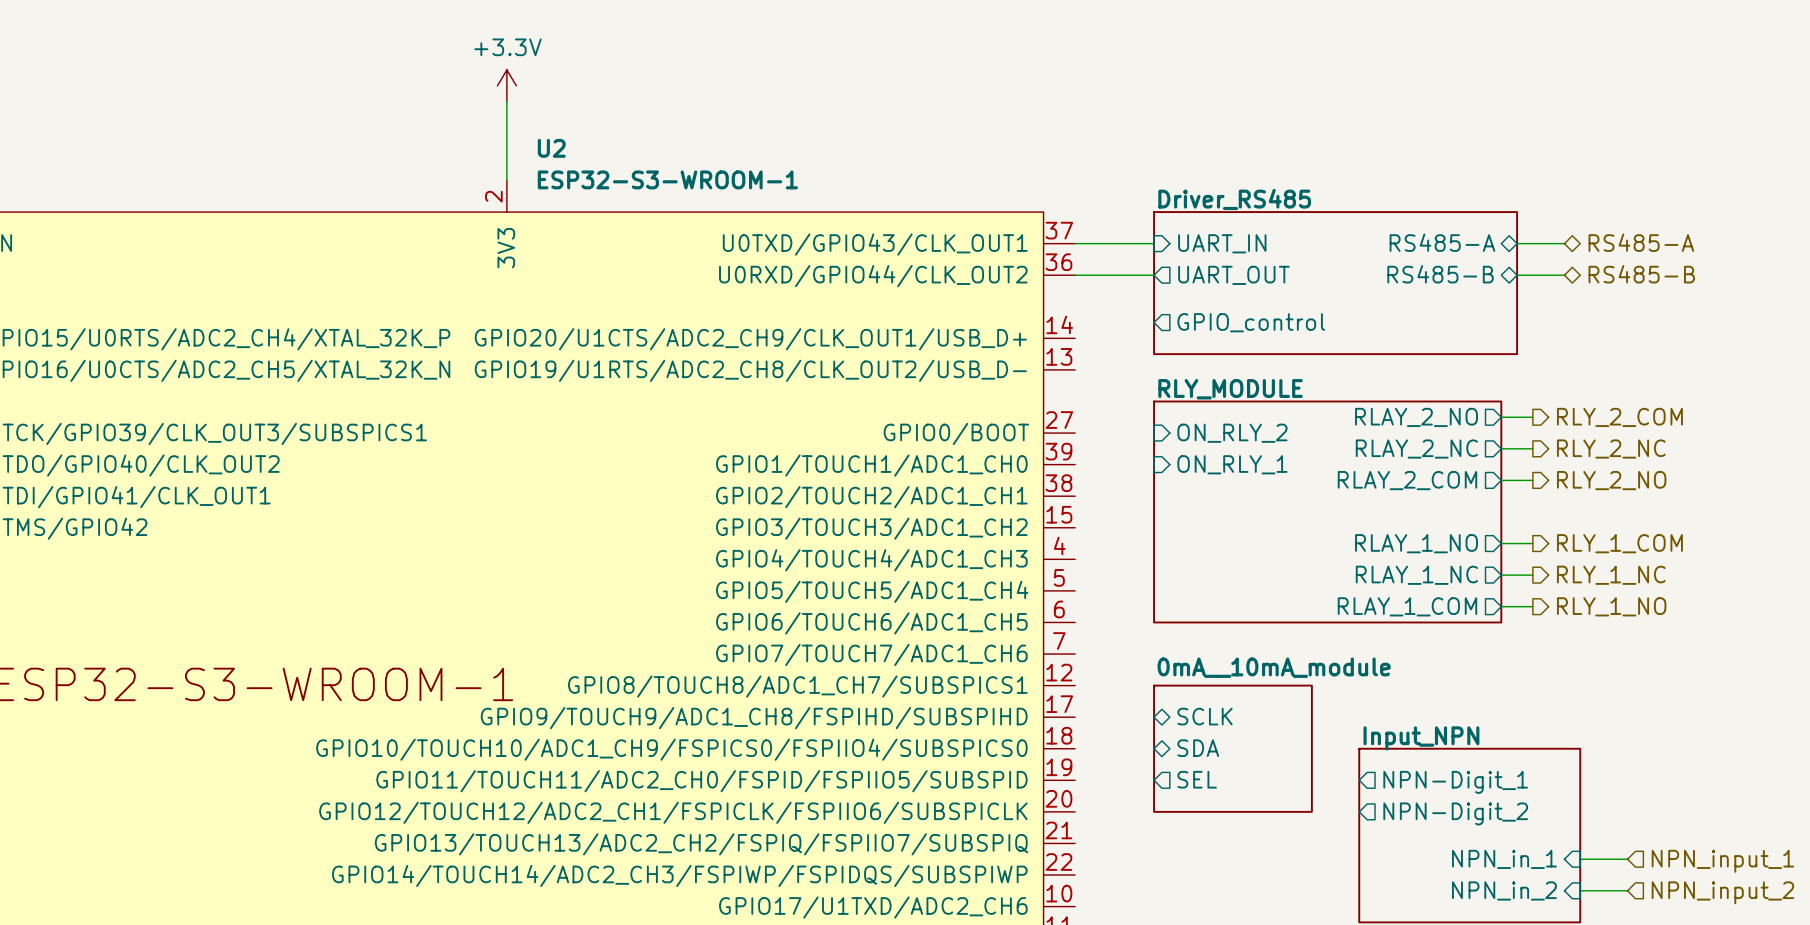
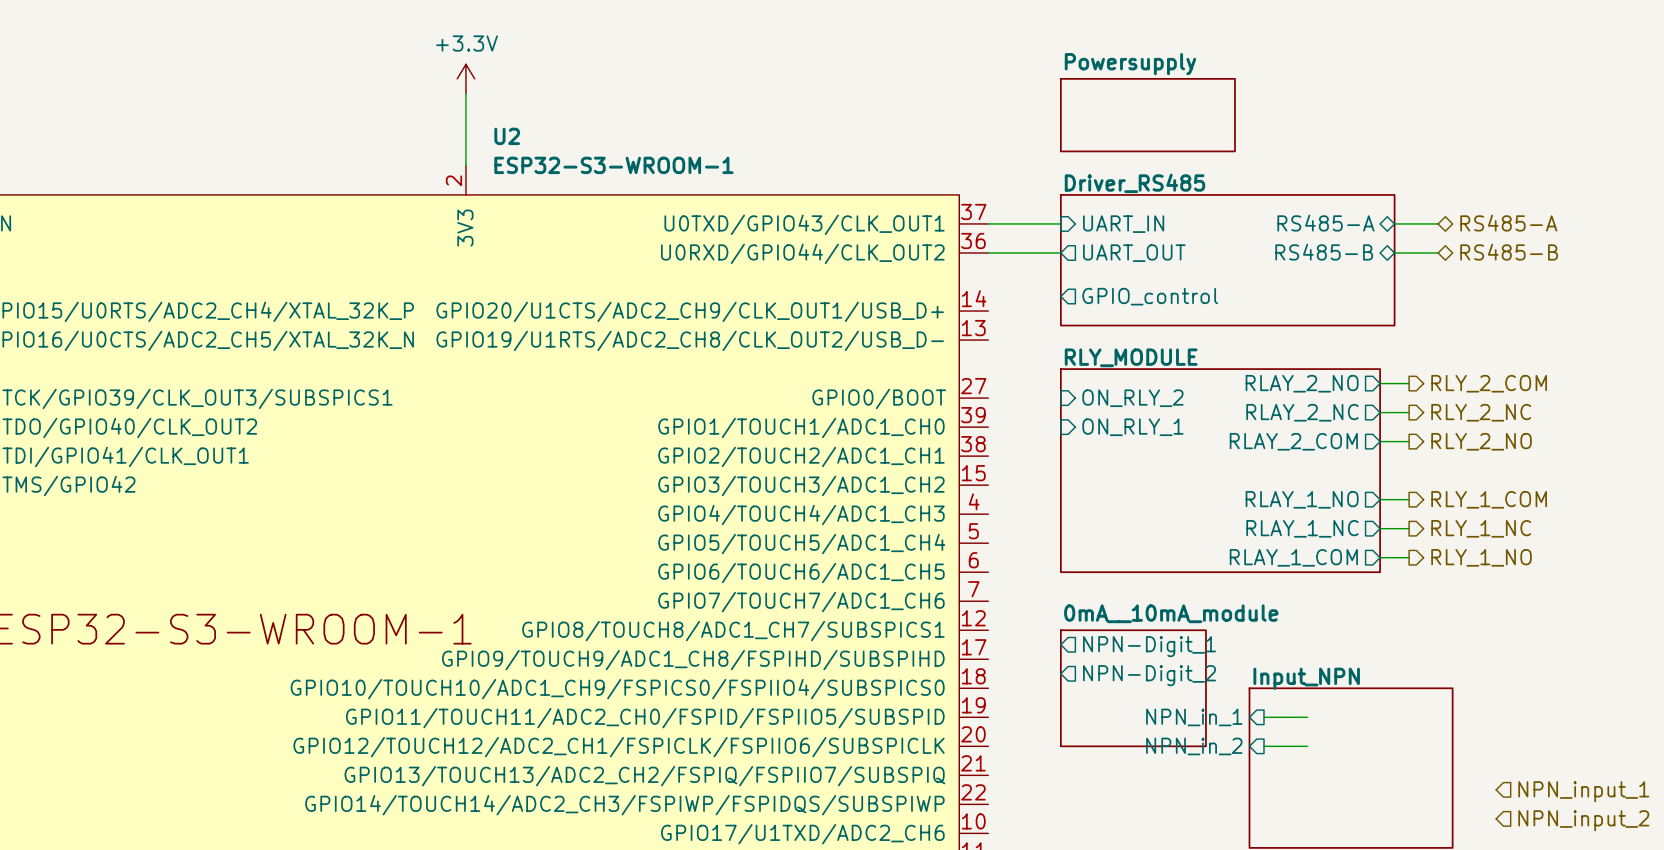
sheet Powersupply: none -> (1147, 115)
sheet pin: SCLK (1205, 716) -> none
sheet pin: SDA (1198, 748) -> none
sheet pin: SEL (1197, 779) -> none
sheet pin position: NPN-Digit_1 (1455, 782) -> NPN-Digit_1 (1149, 646)
sheet pin position: NPN-Digit_2 (1455, 813) -> NPN-Digit_2 (1149, 675)
sheet pin position: NPN_in_1 (1504, 859) -> NPN_in_1 (1194, 717)
wire: (1580, 859) (1627, 859) -> (1264, 717) (1307, 717)
sheet pin position: NPN_in_2 (1504, 890) -> NPN_in_2 (1194, 746)
wire: (1580, 890) (1627, 890) -> (1264, 746) (1307, 746)

